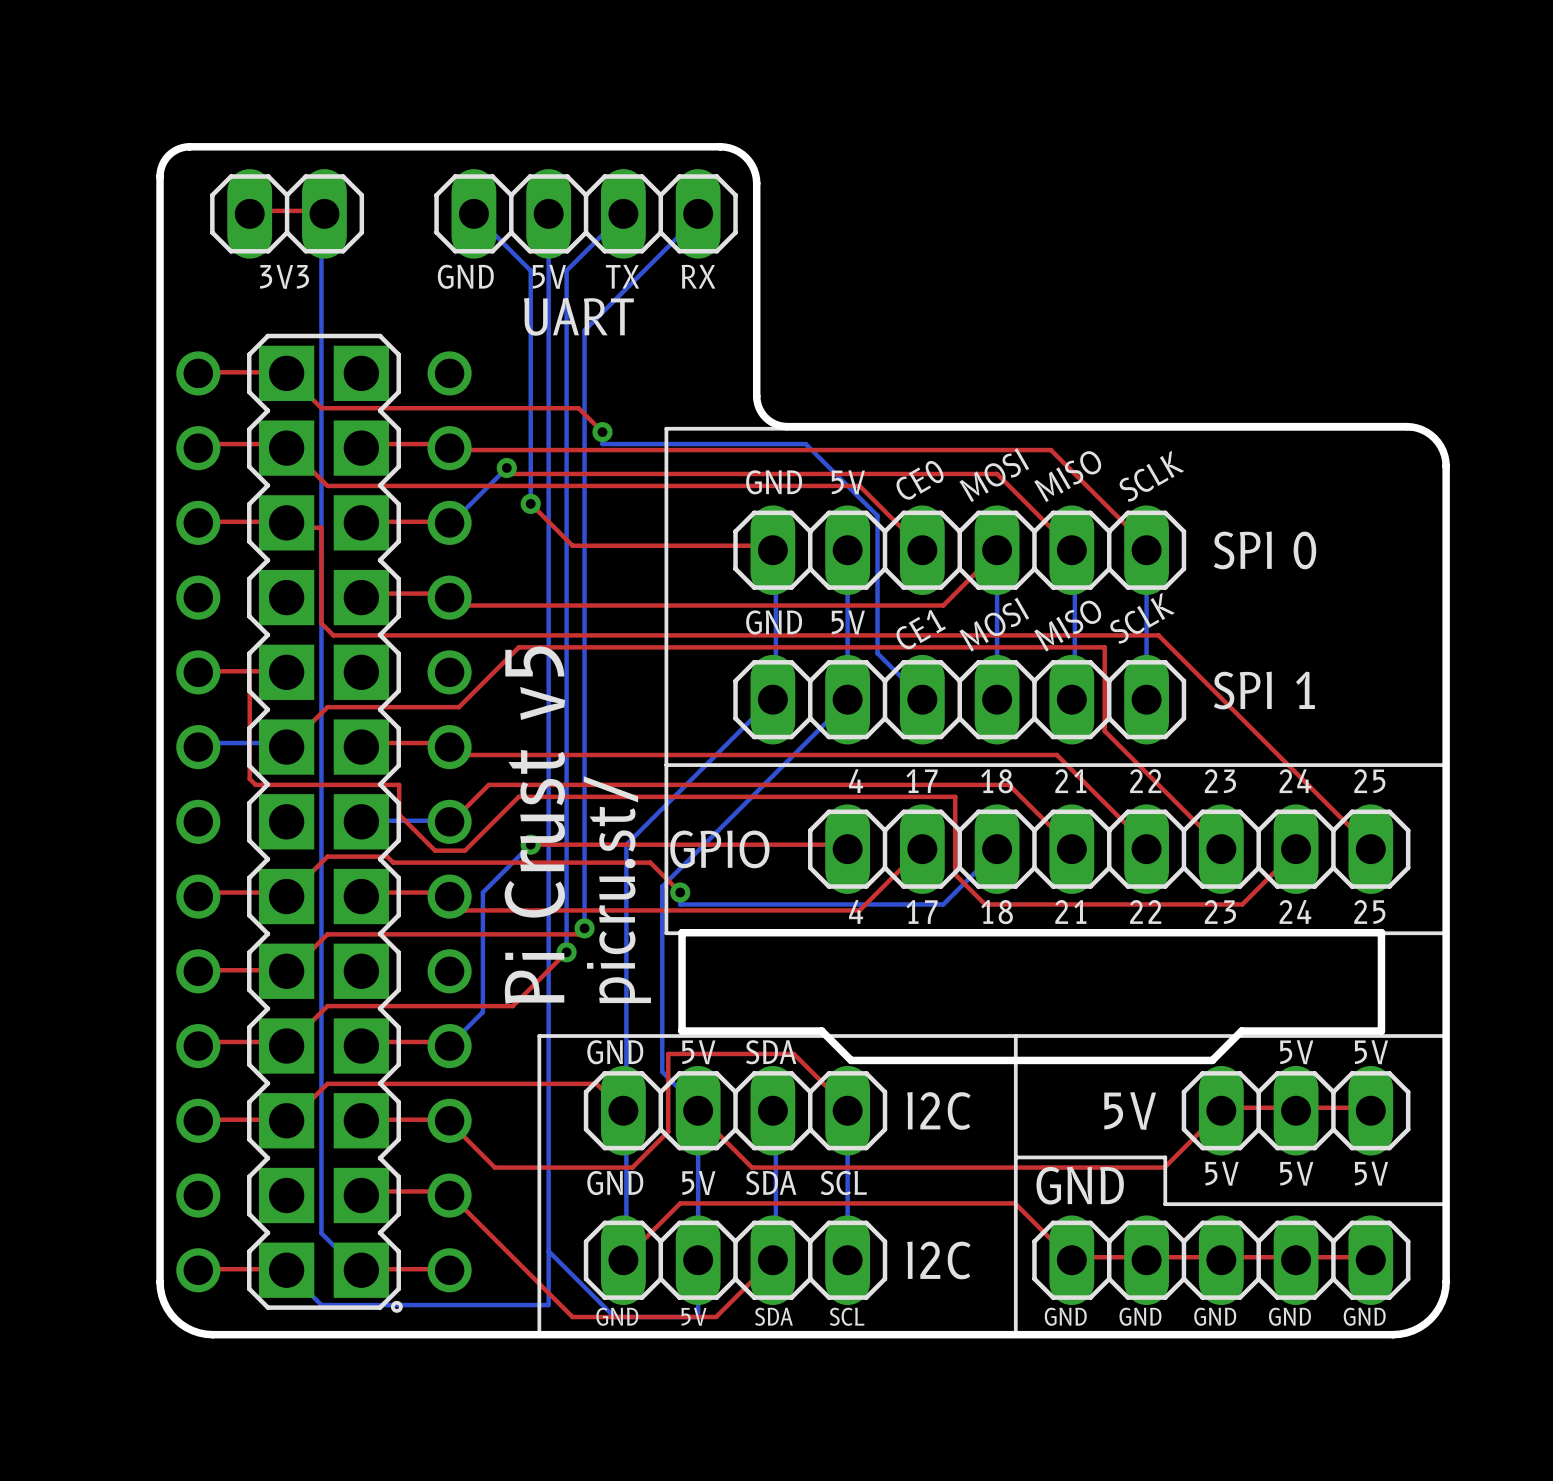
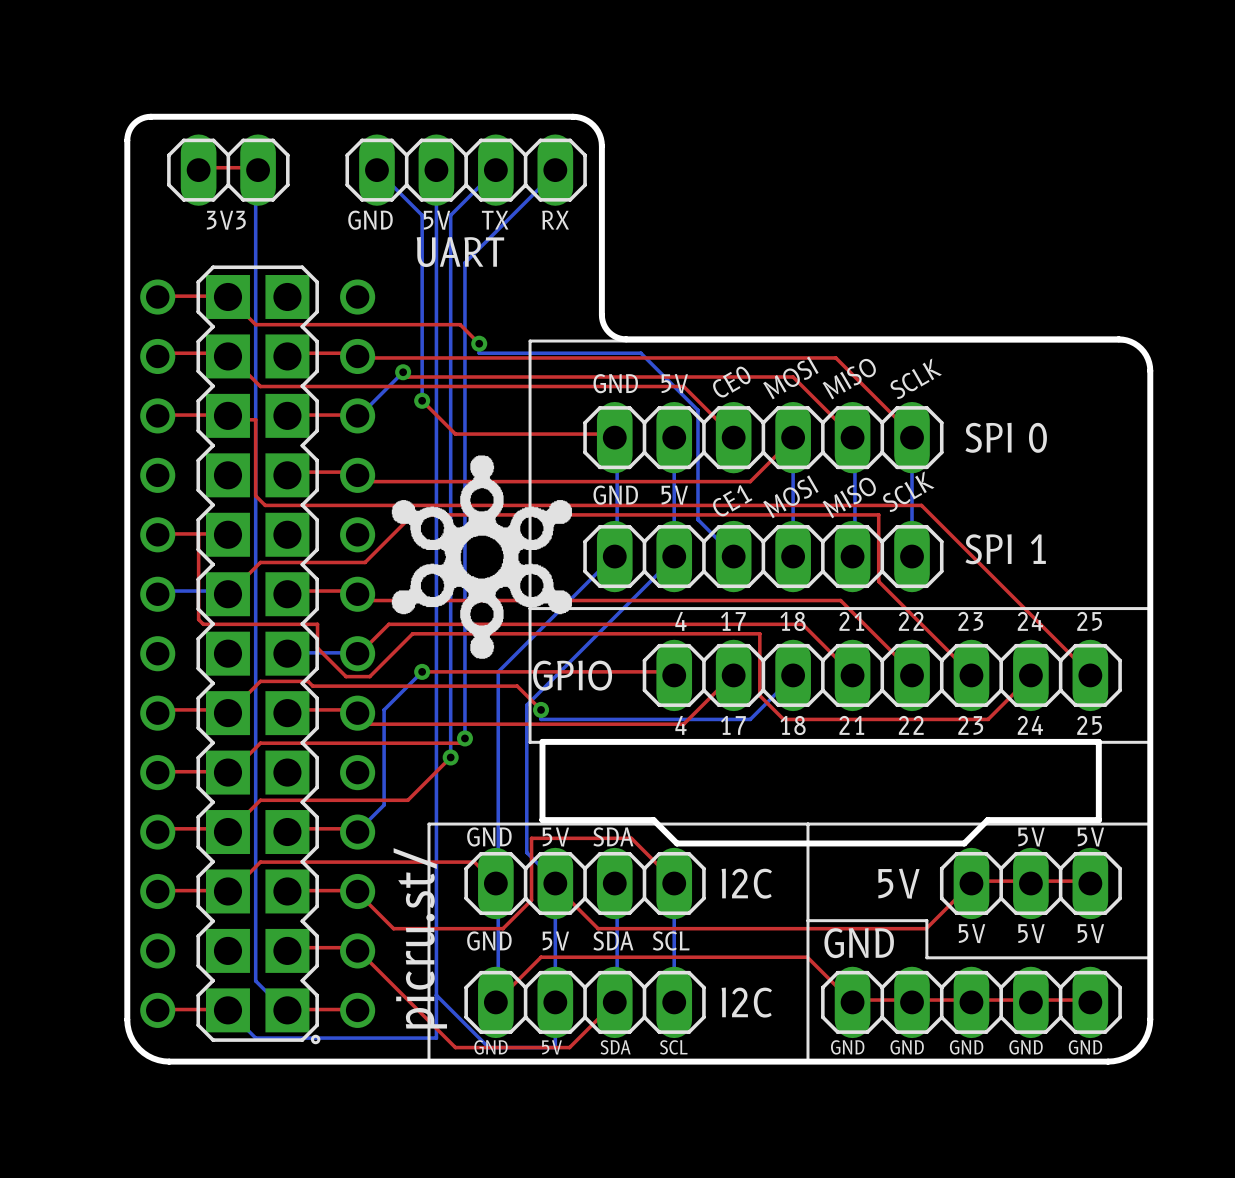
drawing: none -> [391, 455, 572, 659]
text: Pi Crust v5 (534, 825) -> none
text position: picru.st/ (617, 889) -> picru.st/ (420, 938)

